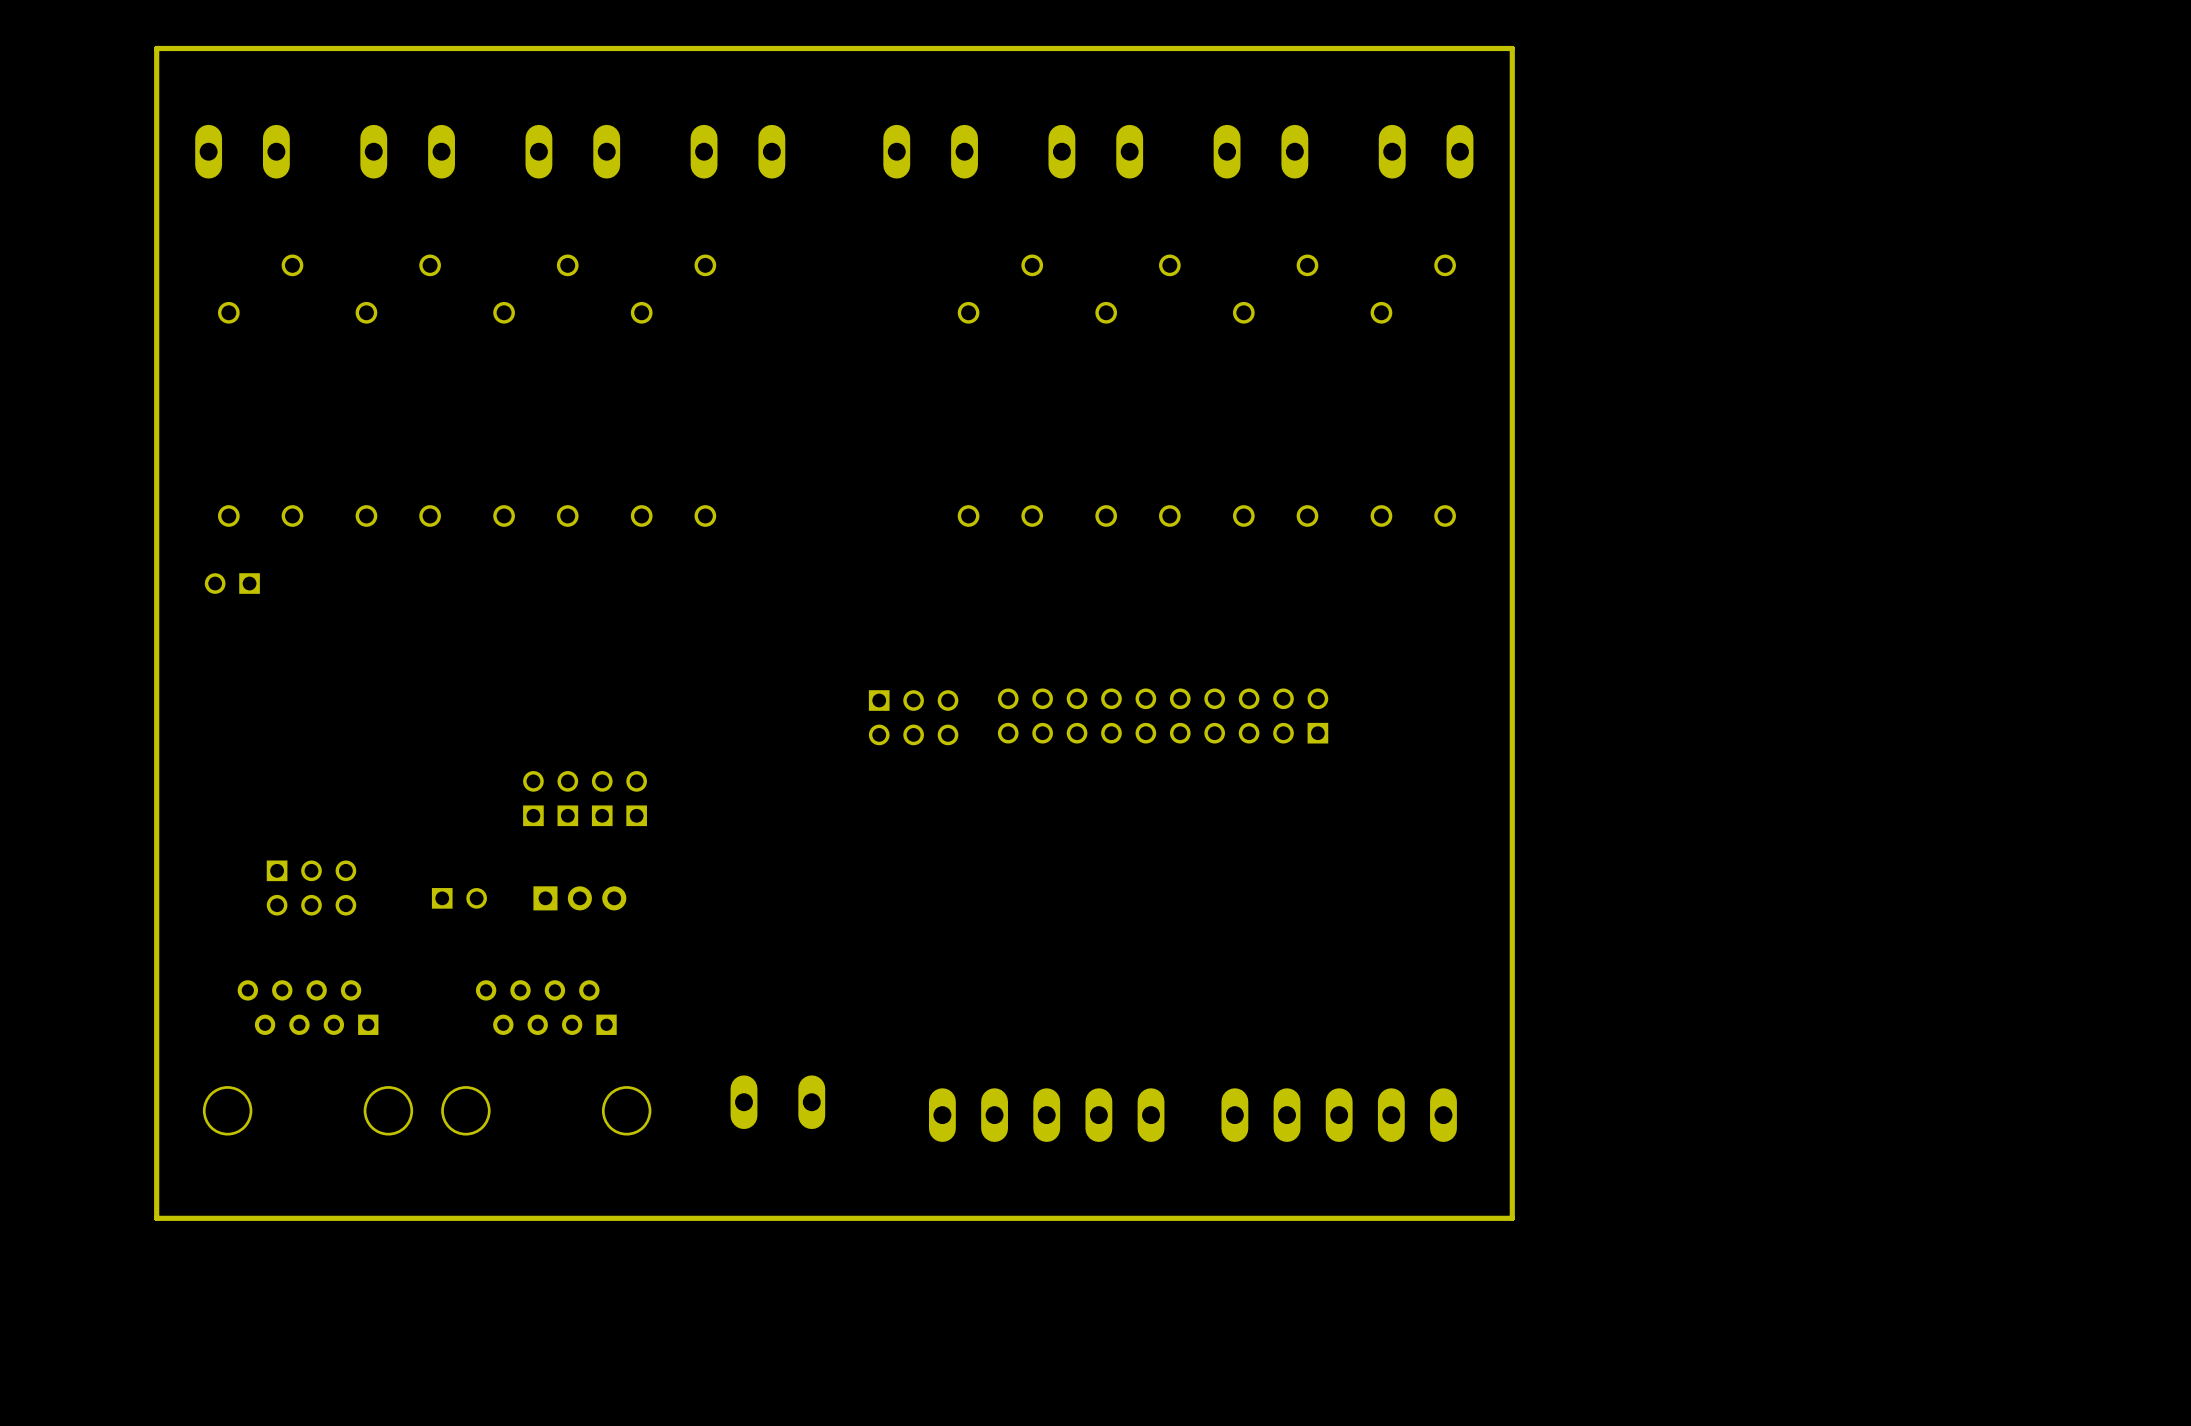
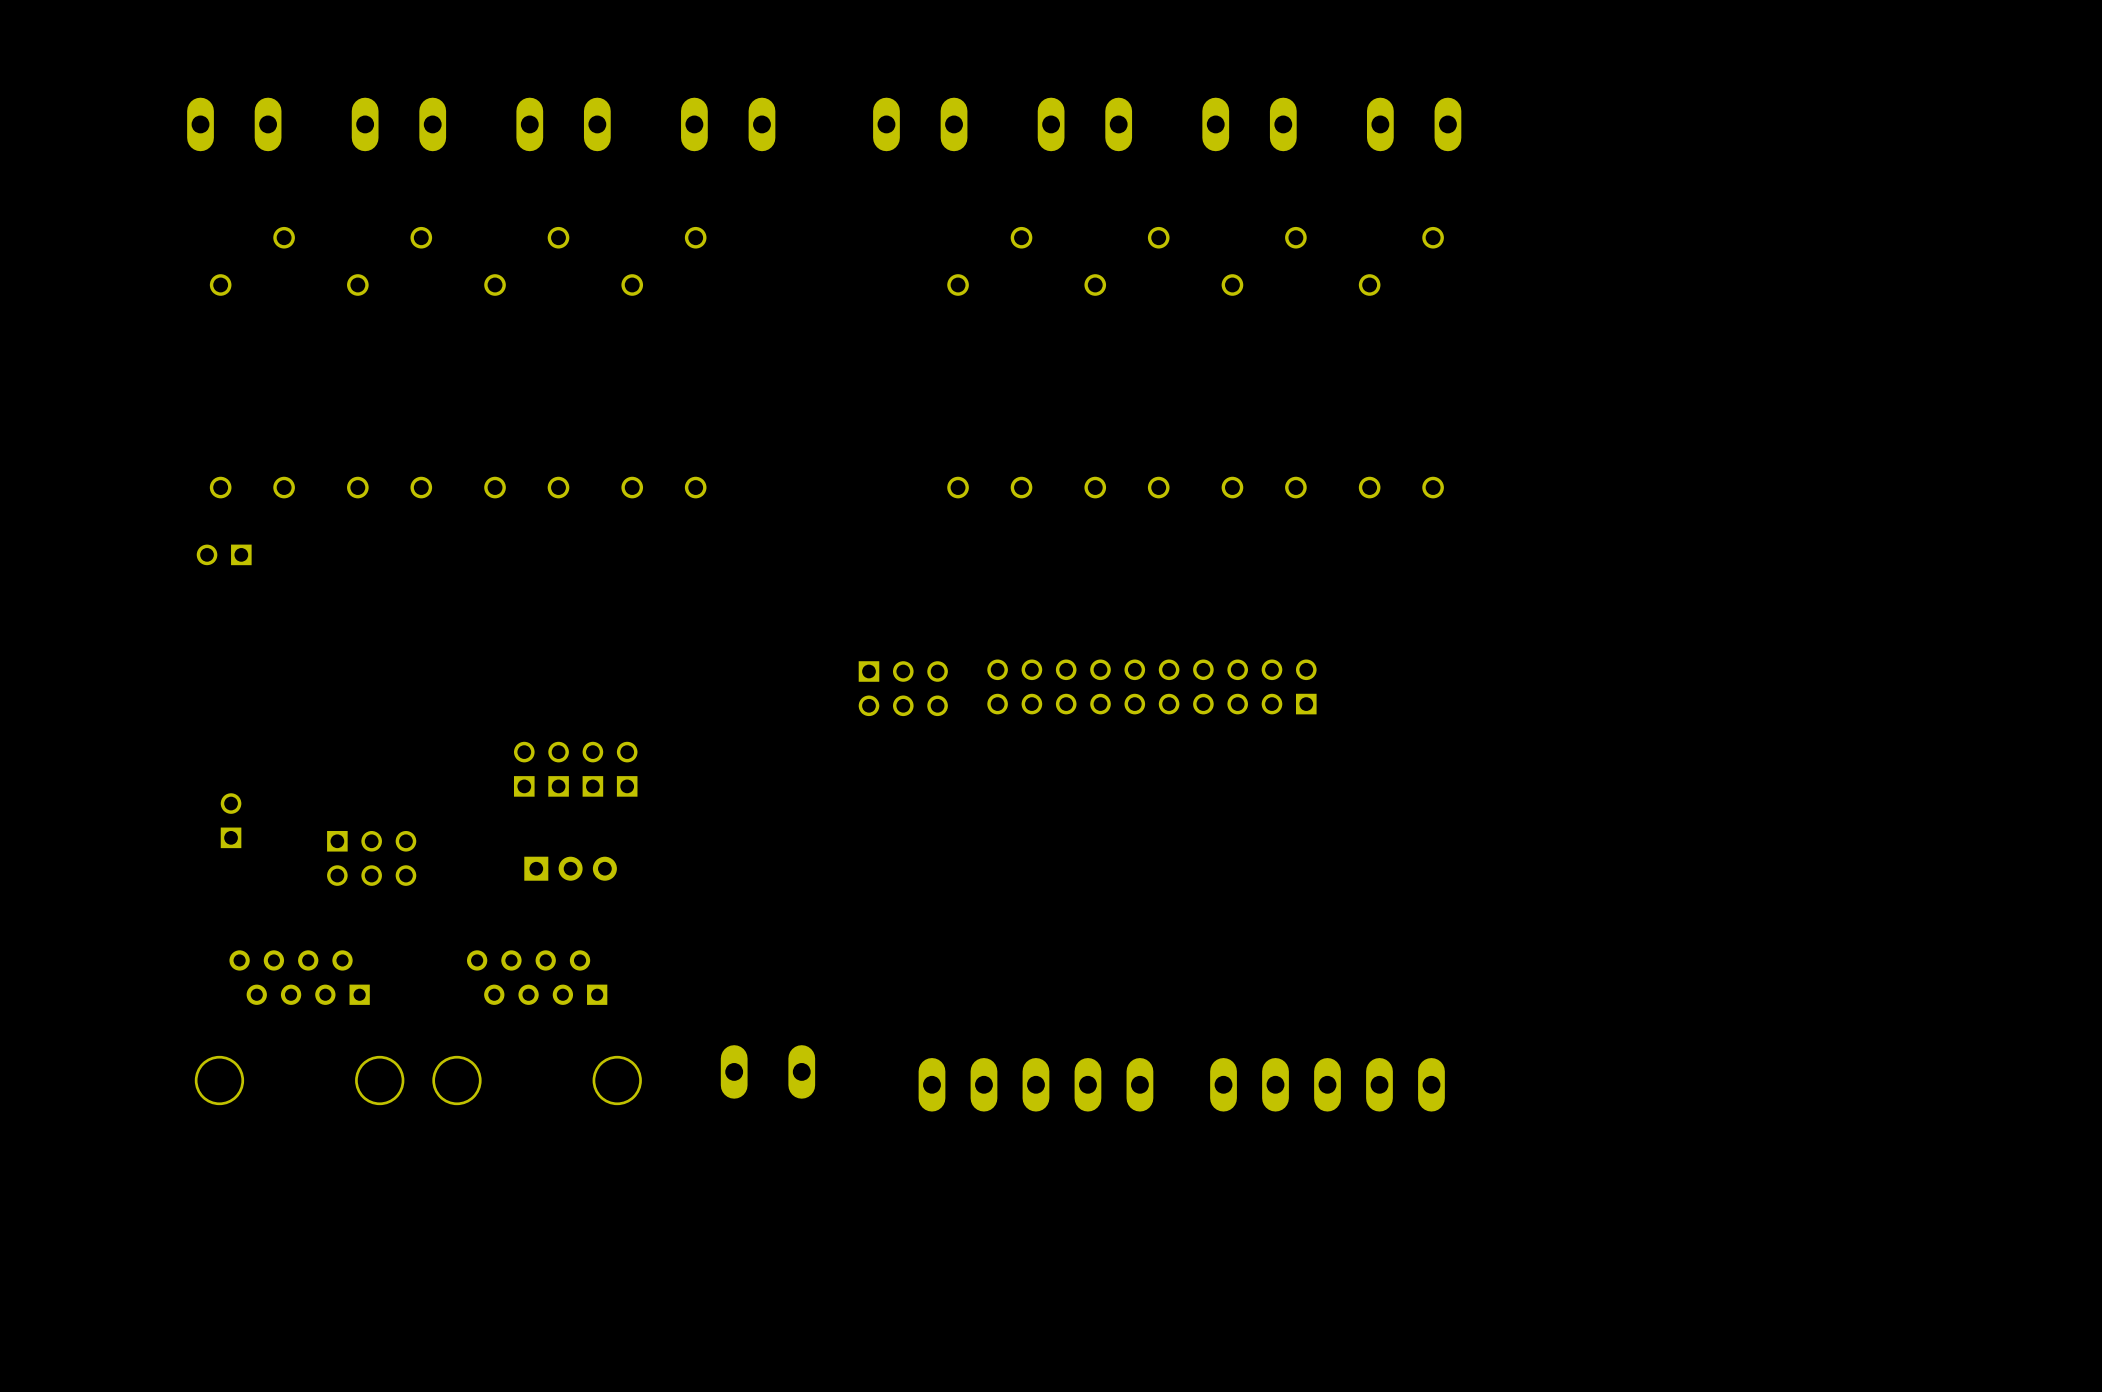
board edge: (1512, 48) (156, 48) (156, 1218) (1512, 1218) (1512, 48) -> none
part position: (311, 888) -> (371, 858)
part rotation: 0° (459, 898) -> 90° counterclockwise (231, 820)
part position: (459, 898) -> (231, 820)

